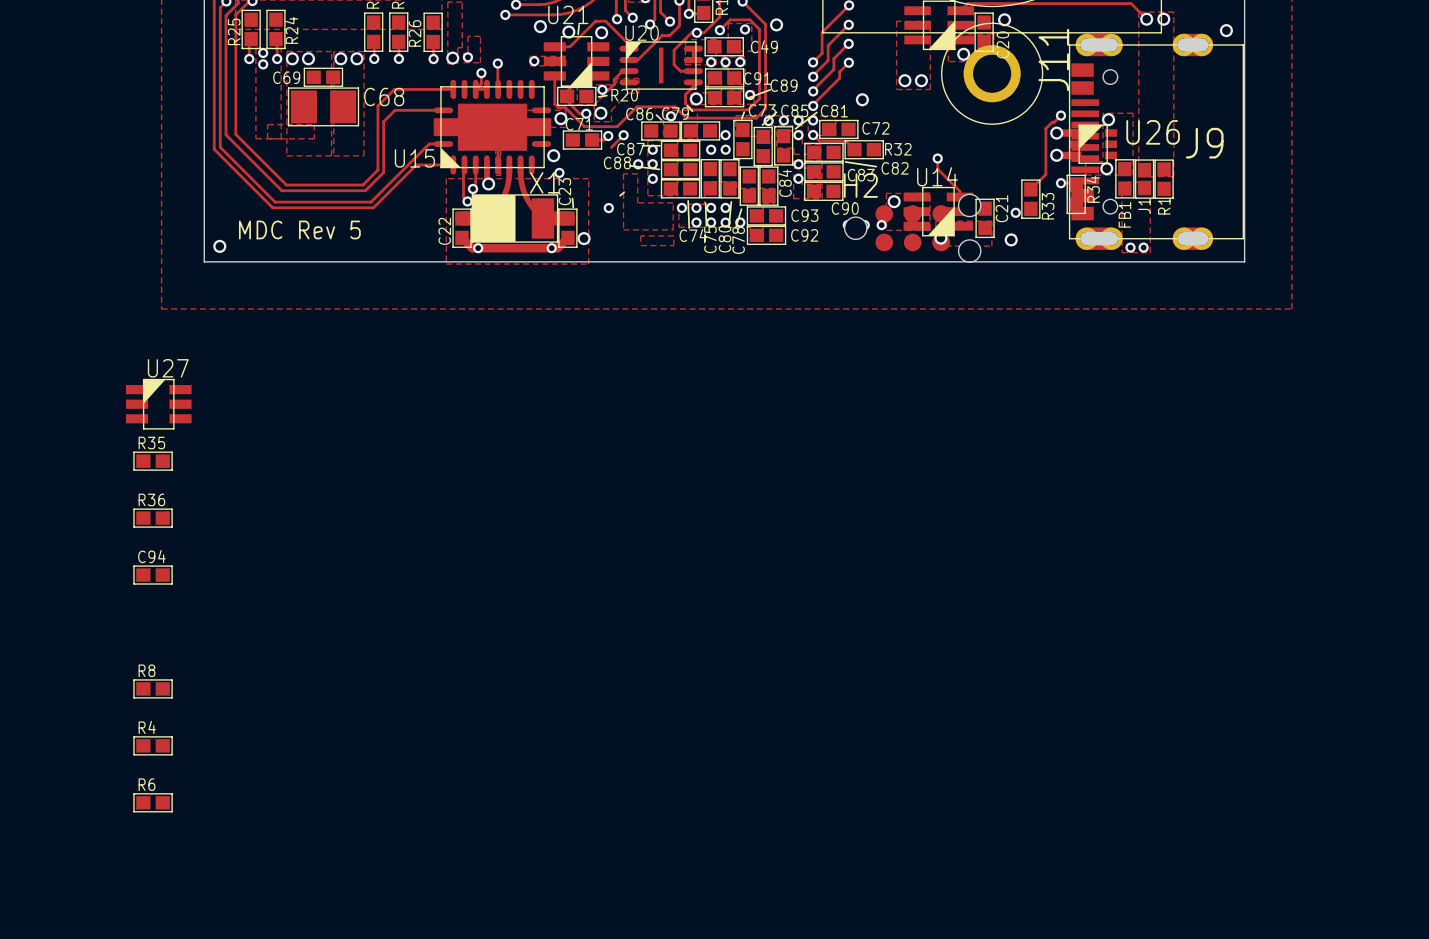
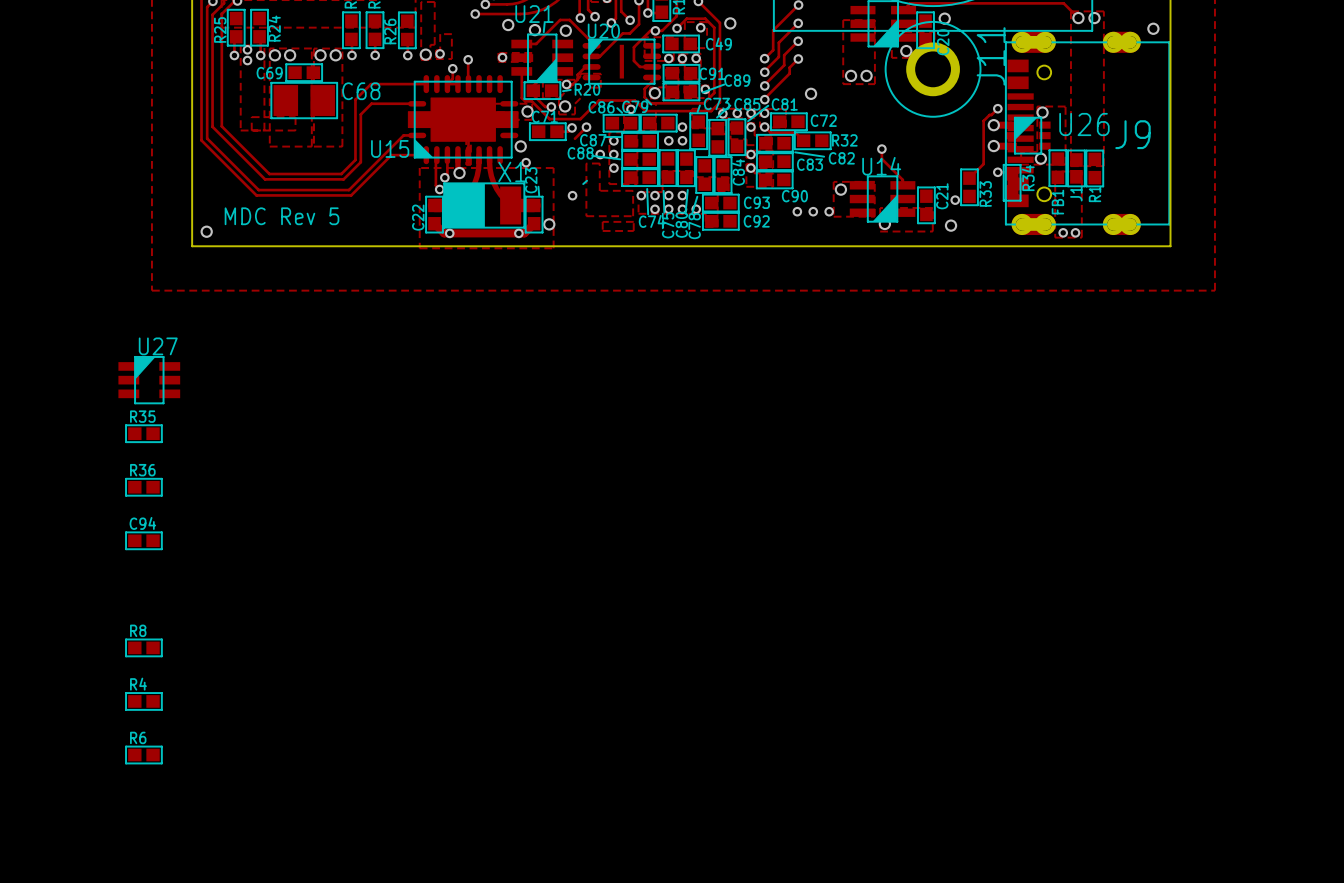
H2: (912, 228) -> none

